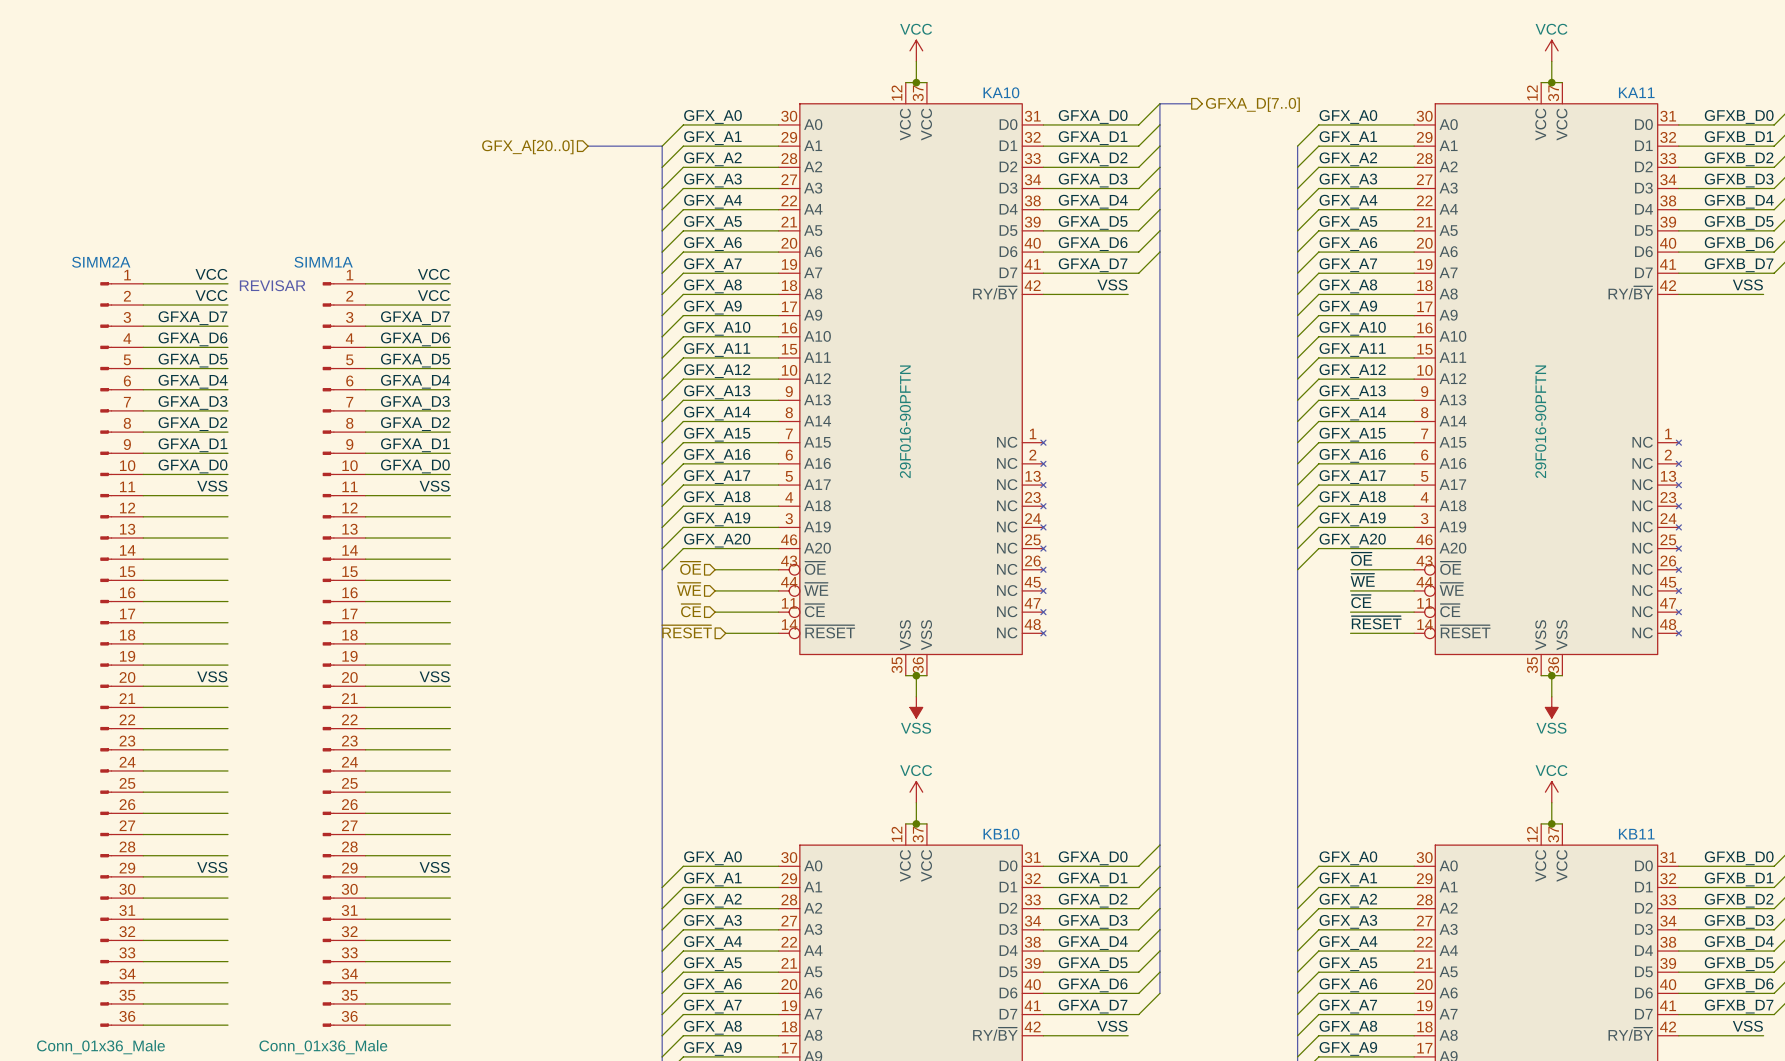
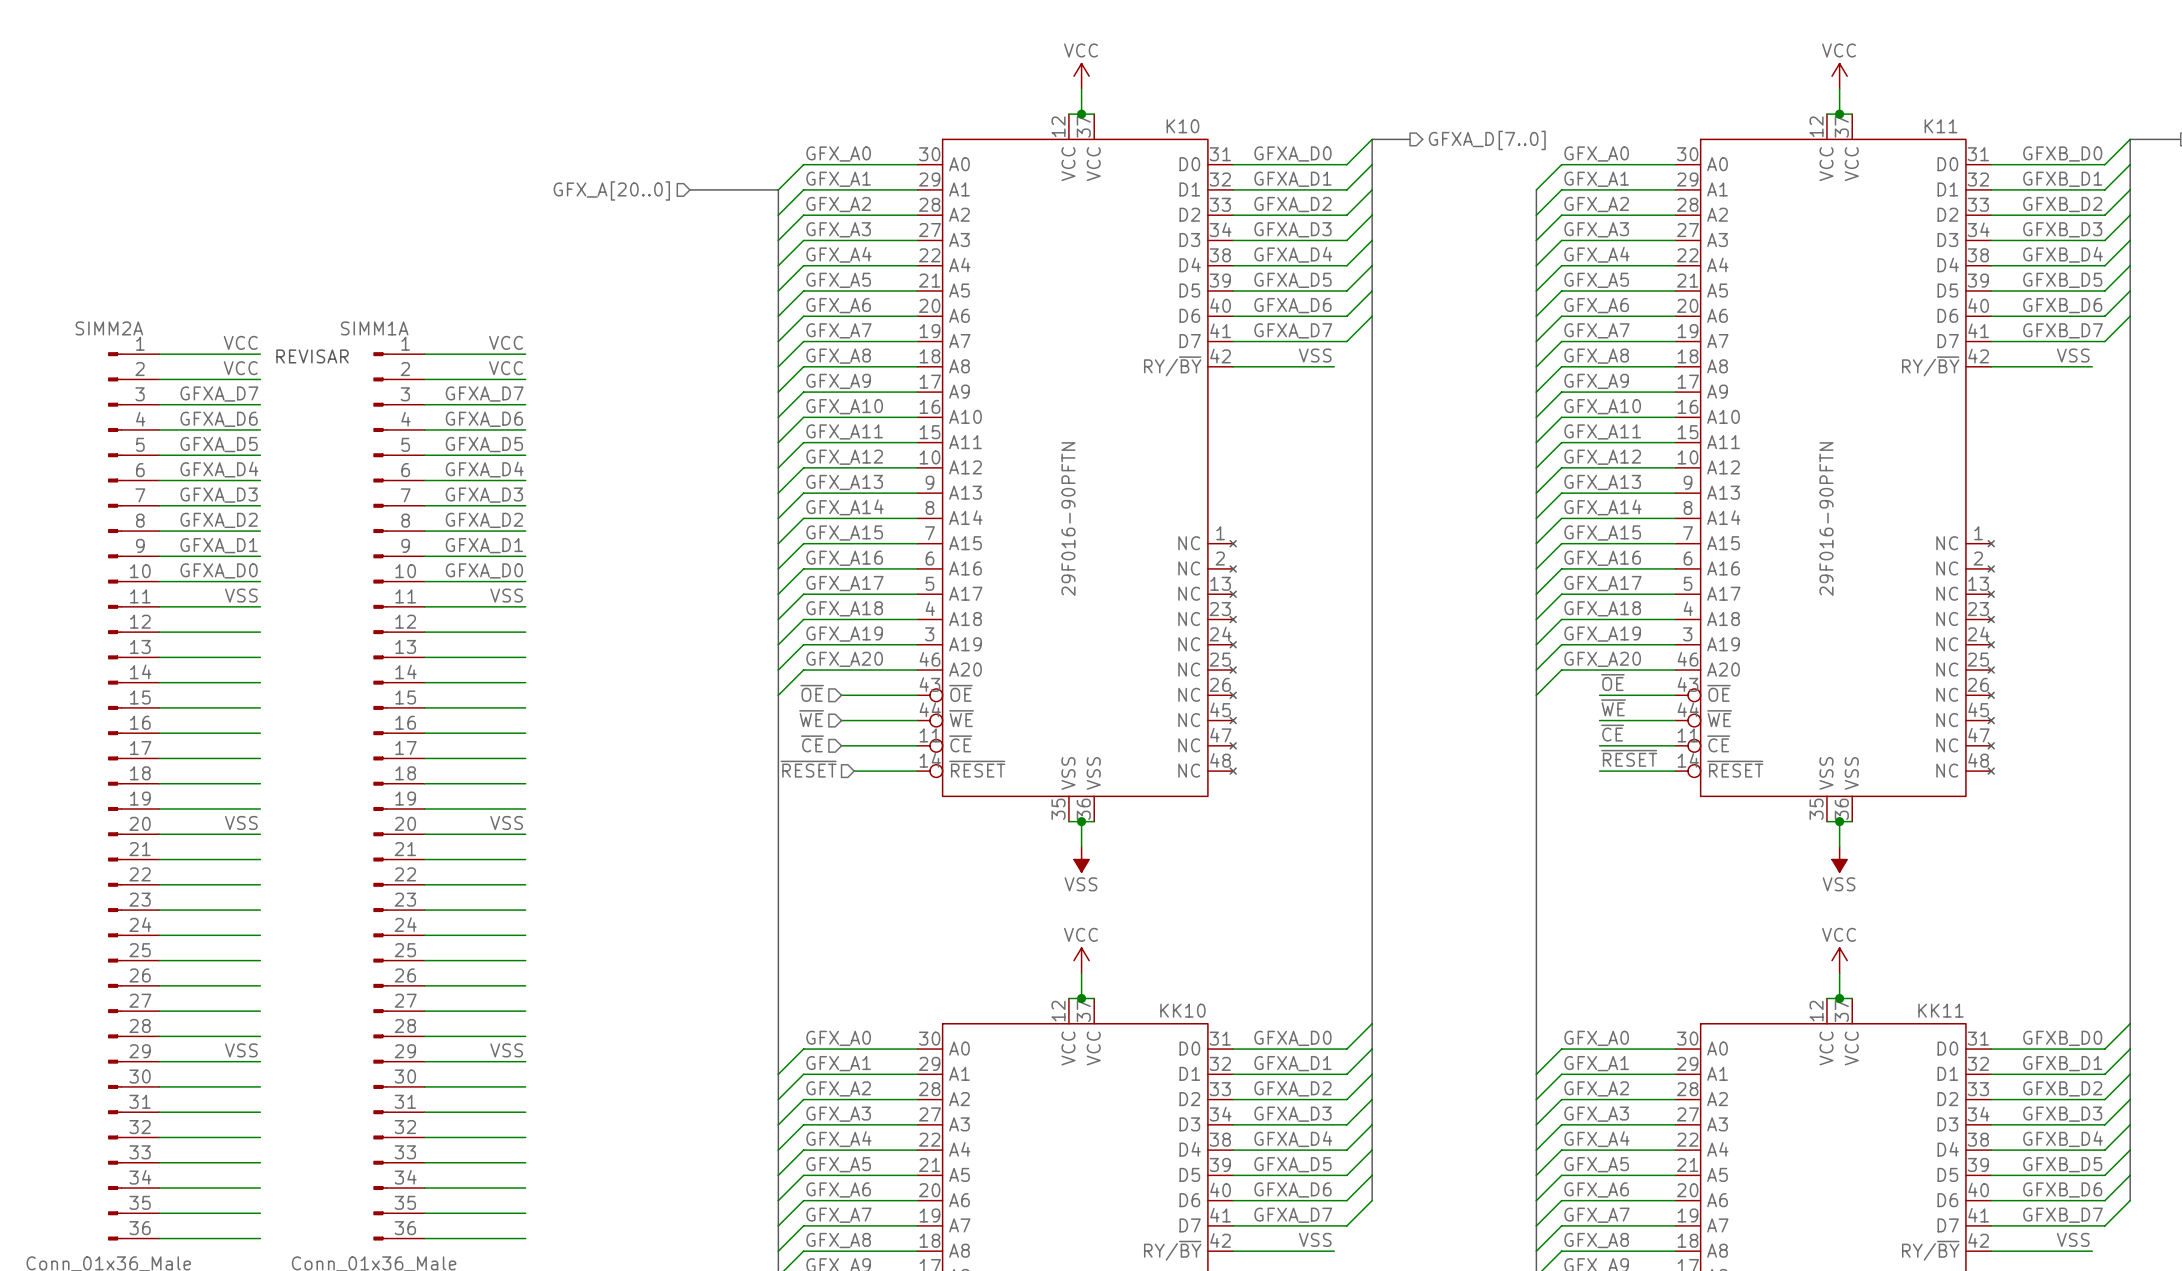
KA10 name: KA10 (1001, 92) -> K10 (1182, 126)
KA11 name: KA11 (1636, 92) -> K11 (1940, 126)
KB10 name: KB10 (1001, 834) -> KK10 (1182, 1010)
KB11 name: KB11 (1636, 834) -> KK11 (1940, 1010)

